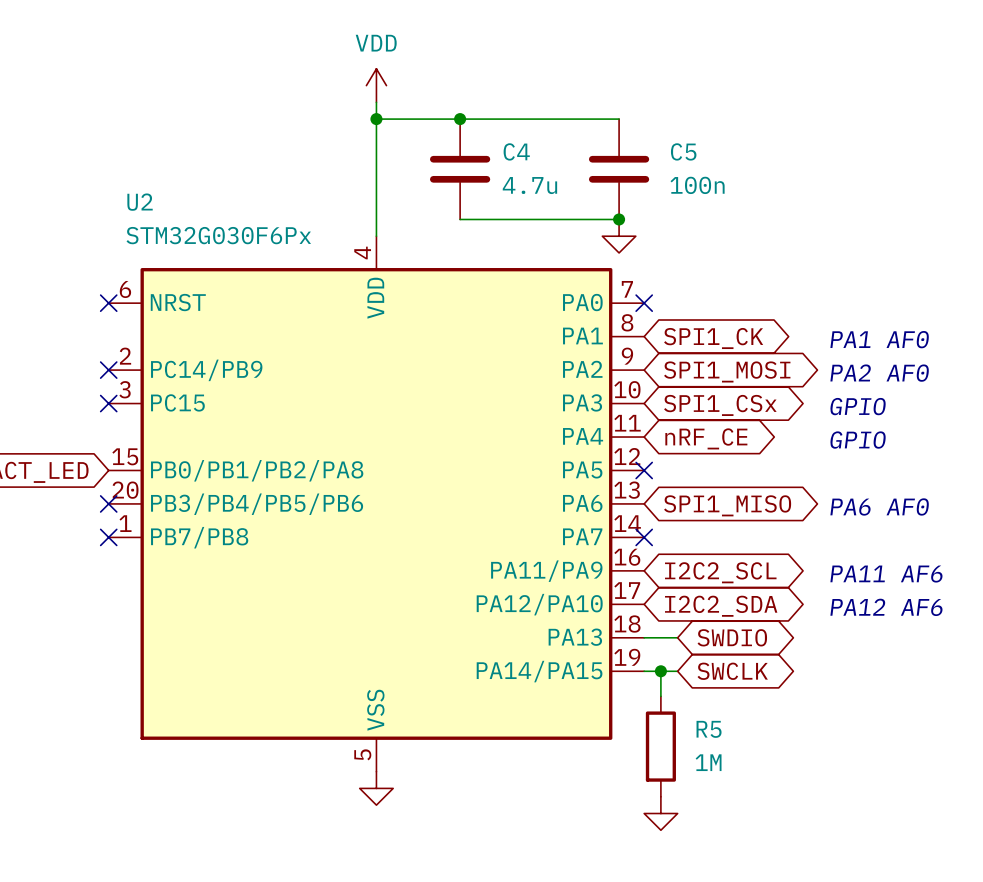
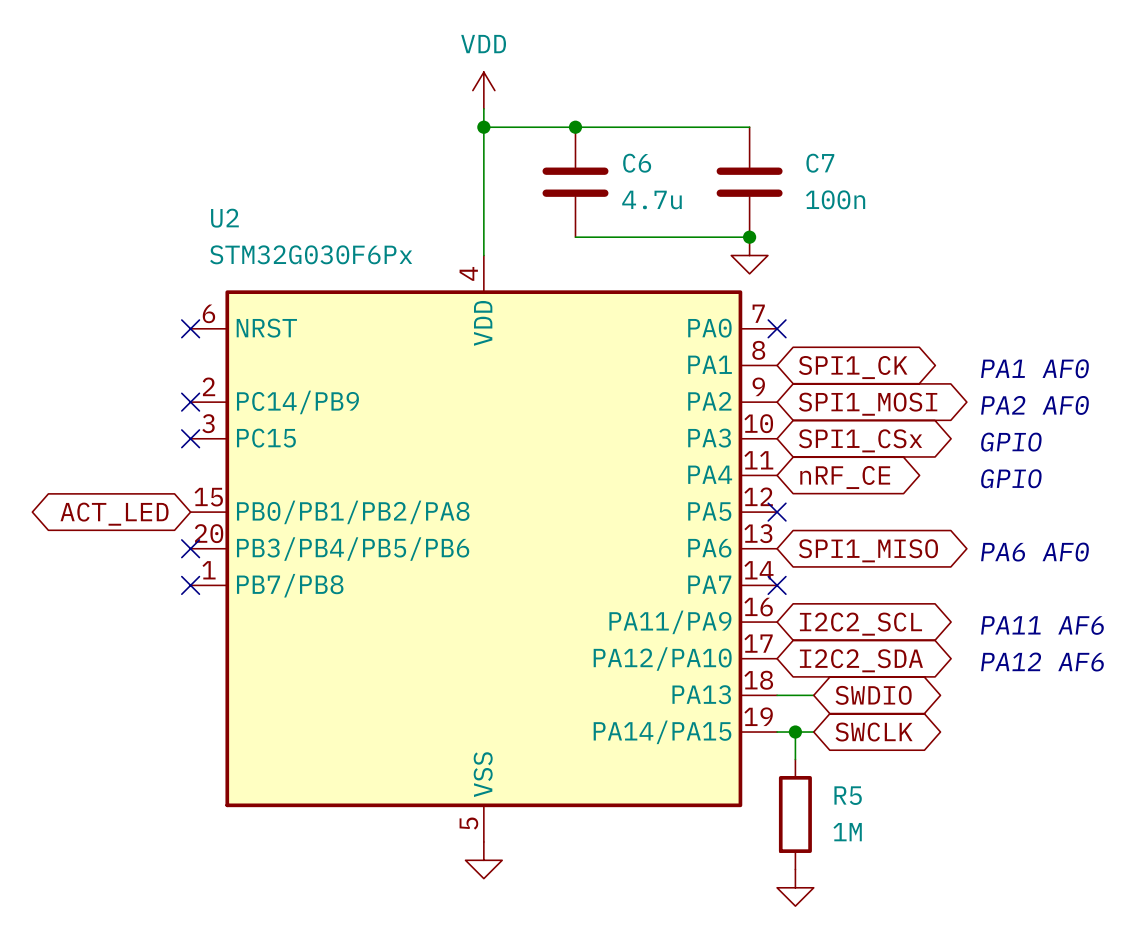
C4 name: C4 (516, 151) -> C6 (637, 163)
C5 name: C5 (683, 151) -> C7 (820, 163)

